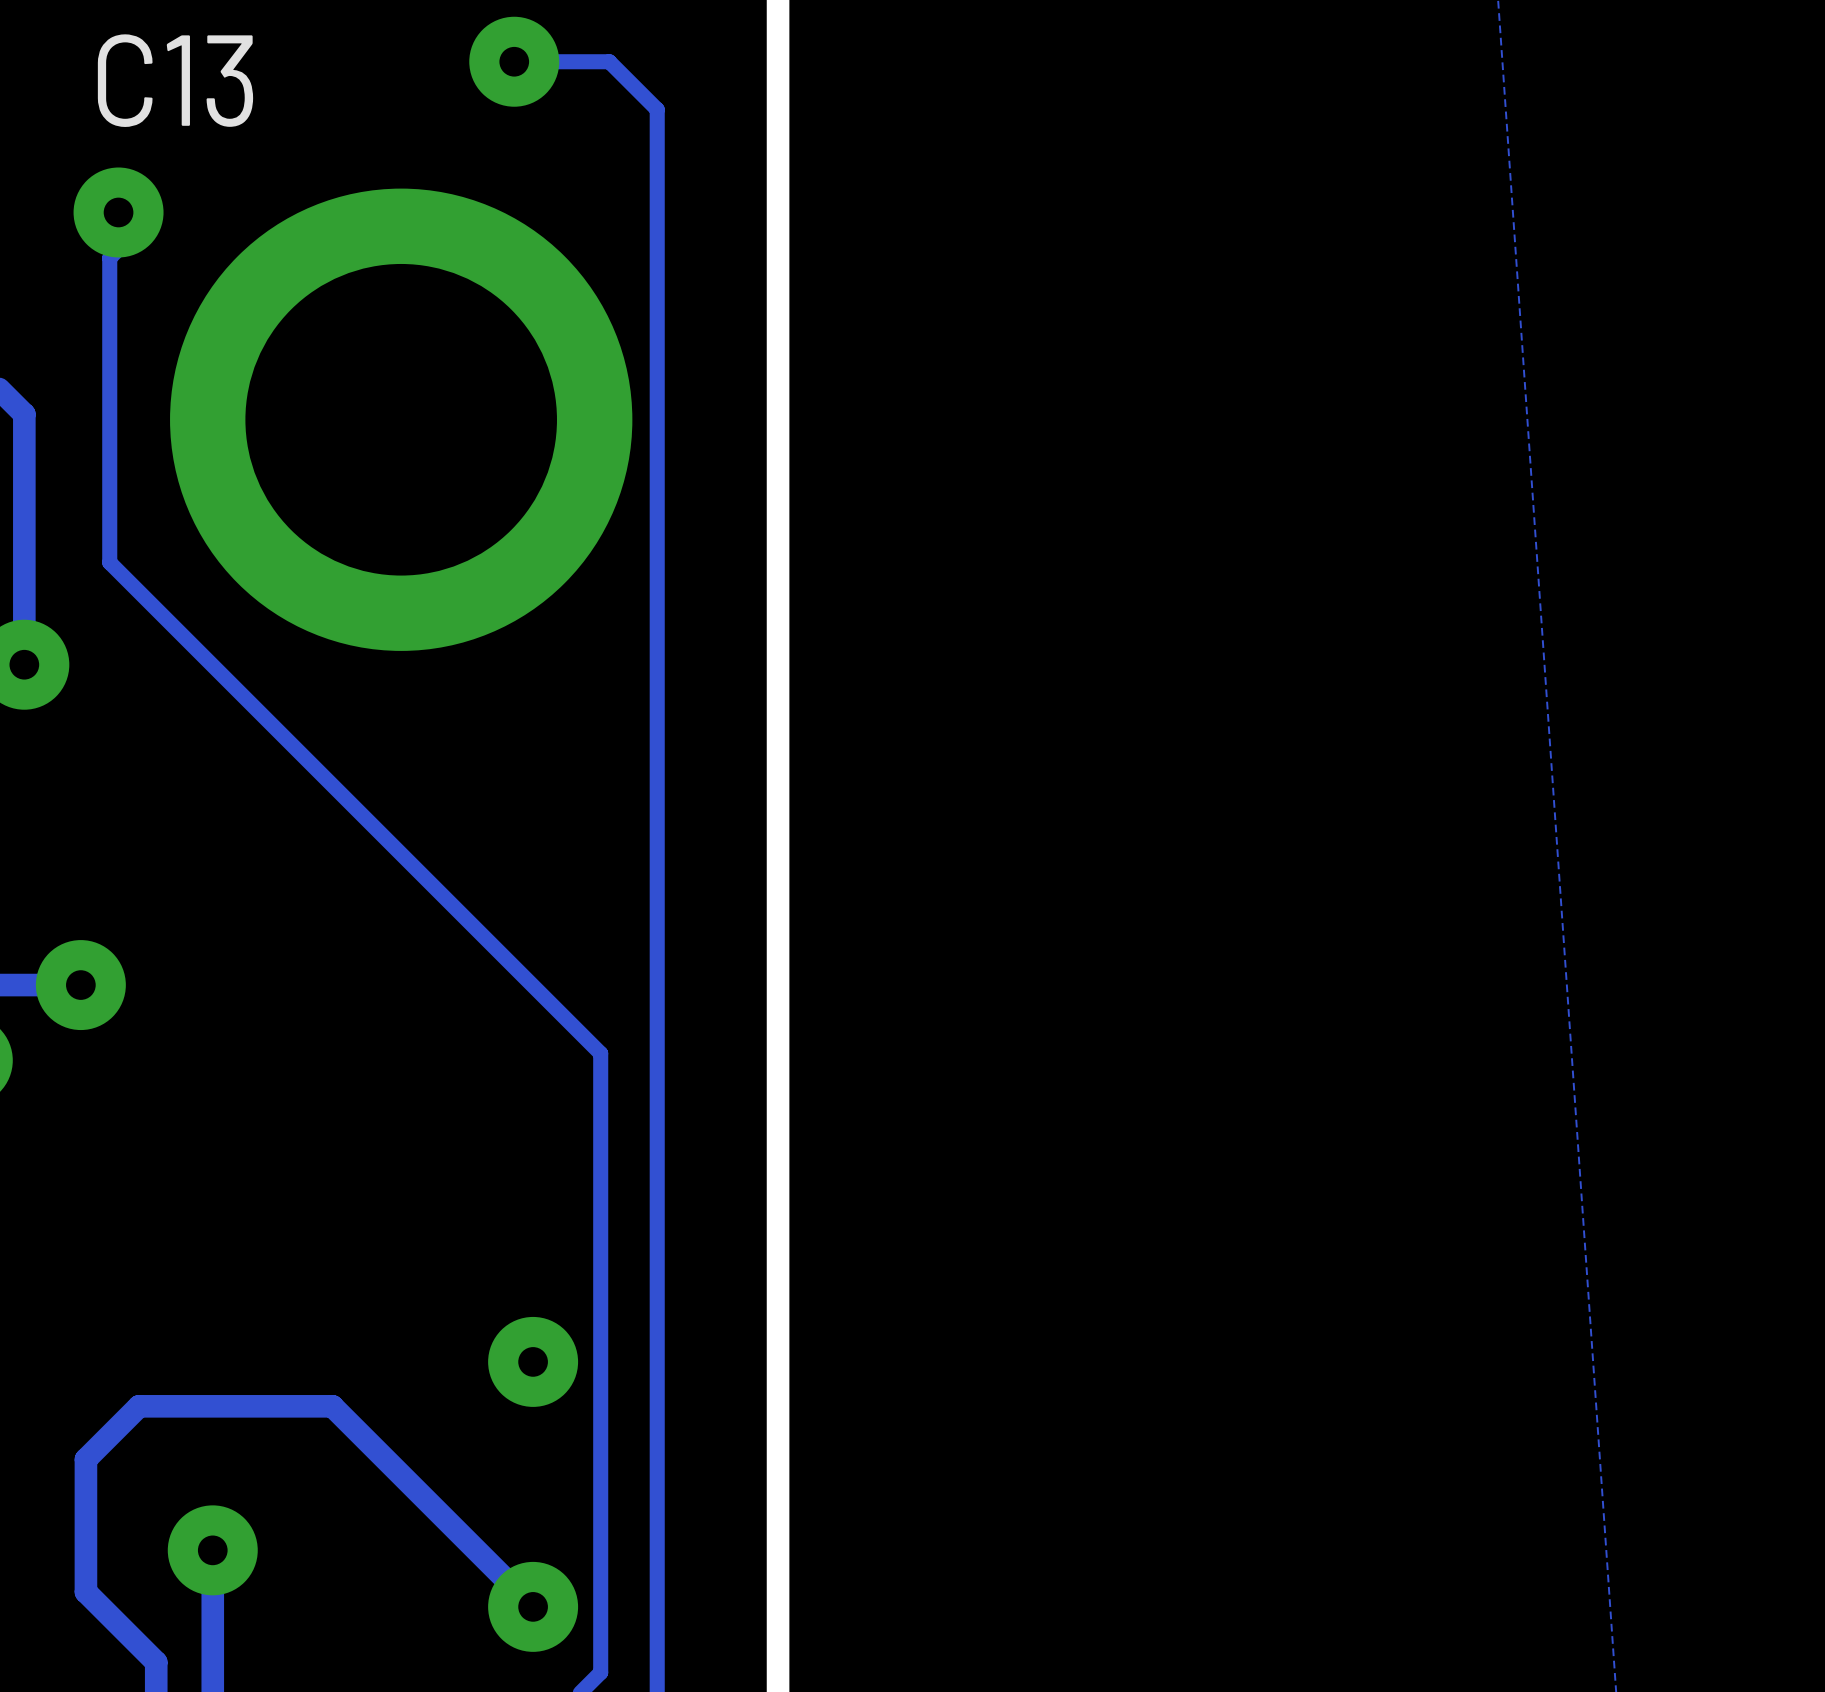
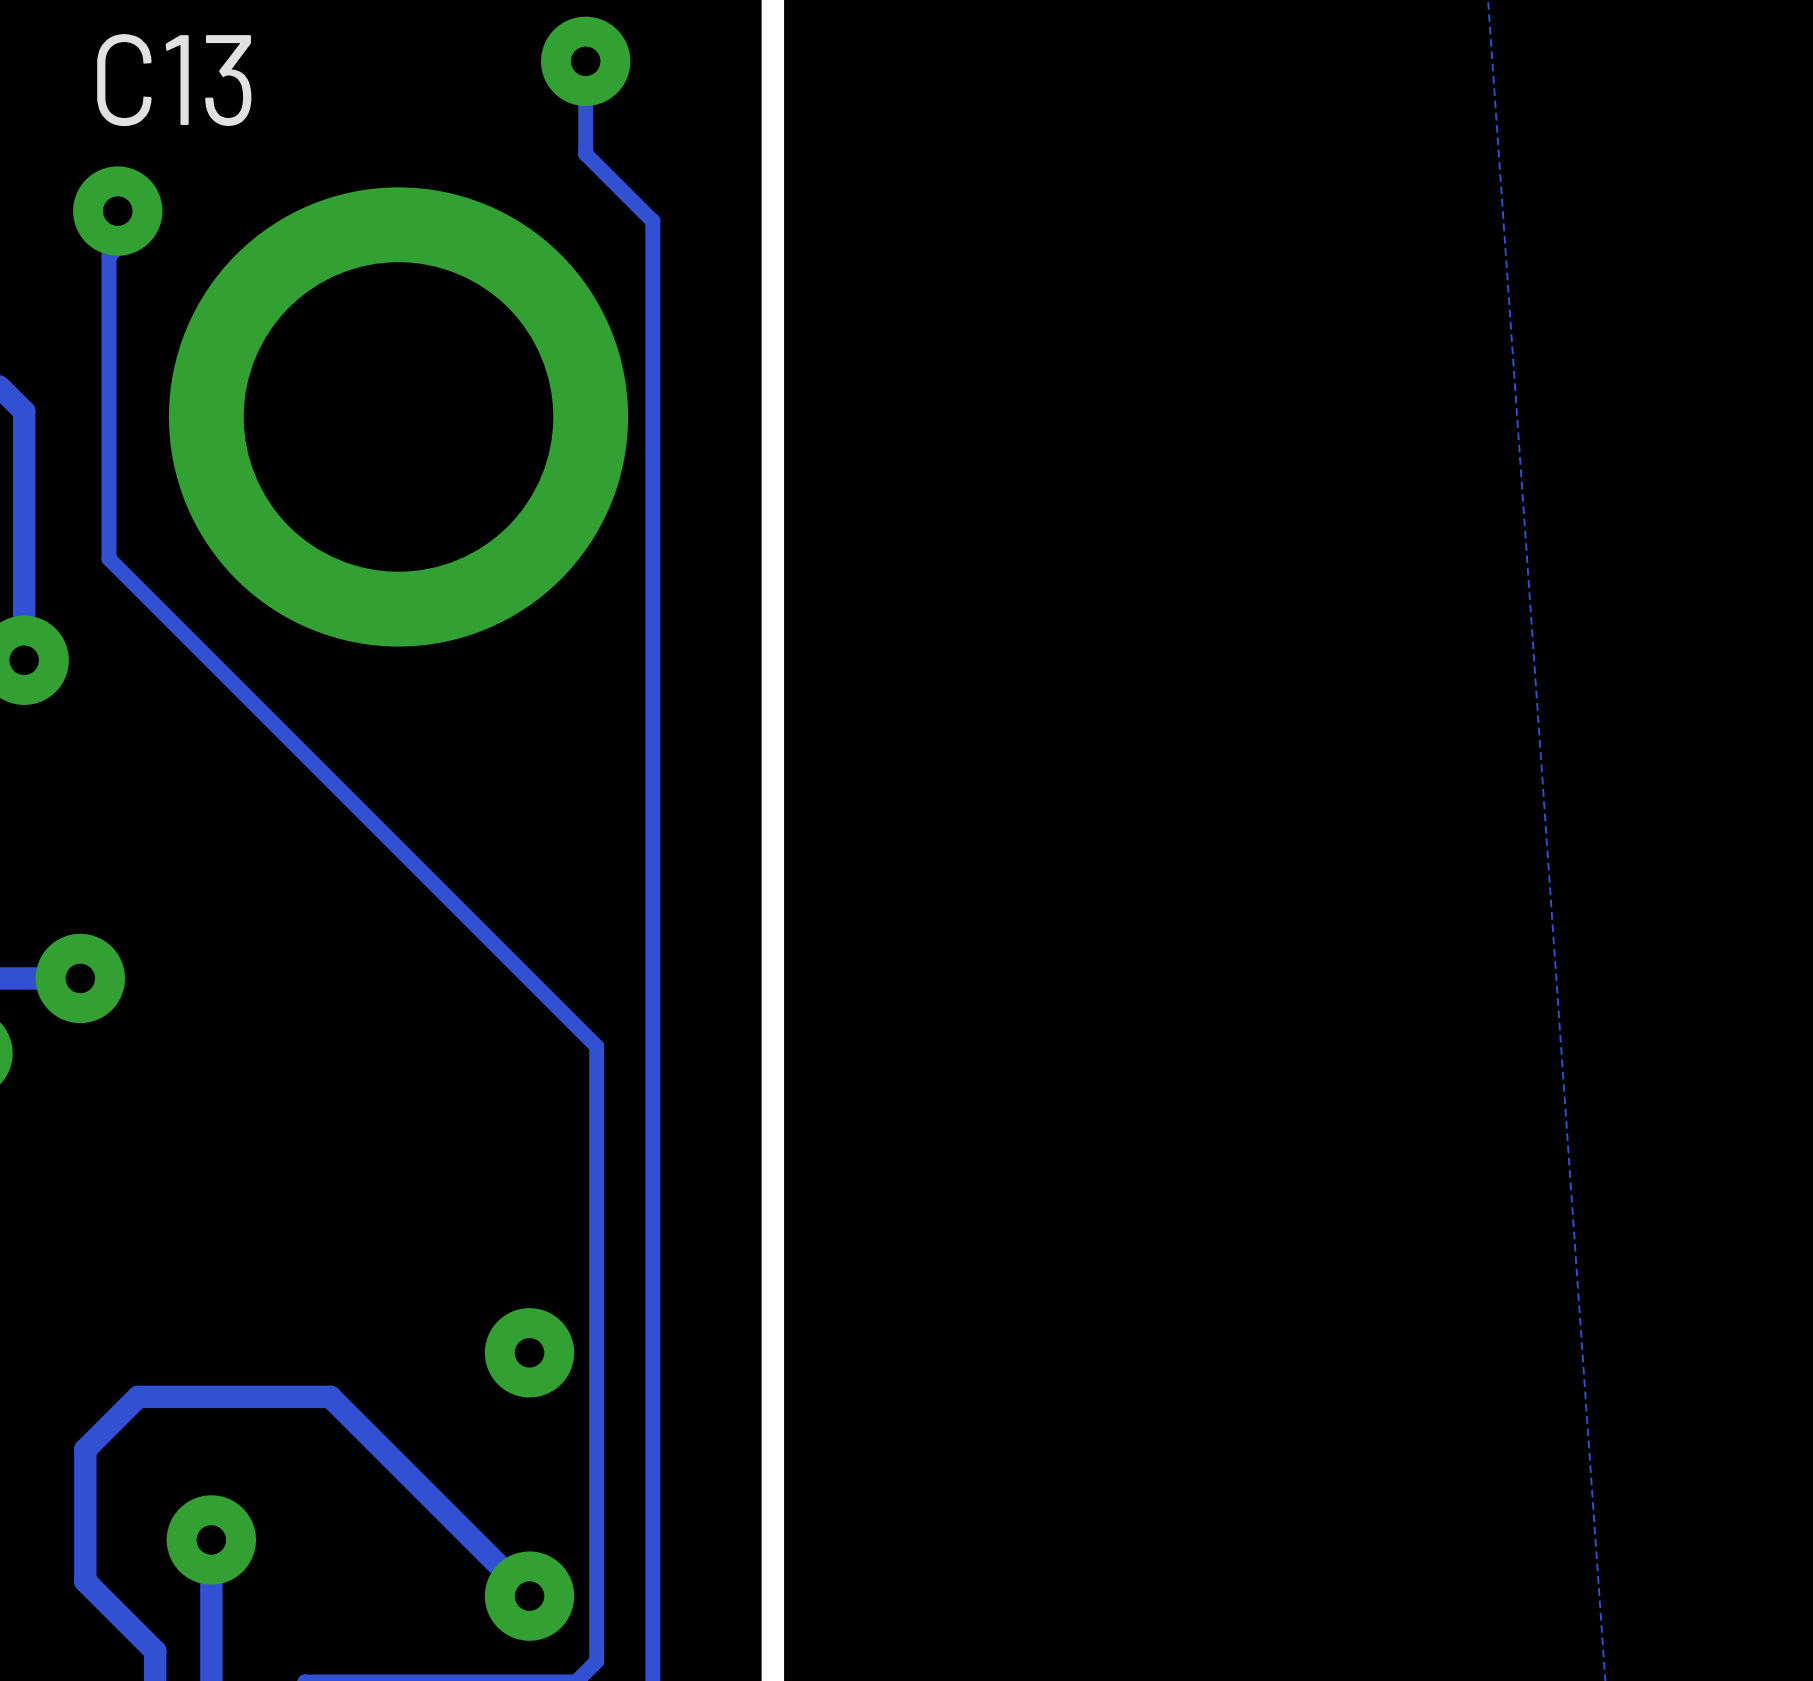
track: (514, 61) (609, 61) (657, 109) (657, 222) -> (585, 61) (585, 154) (652, 221)
via position: (514, 61) -> (585, 61)

